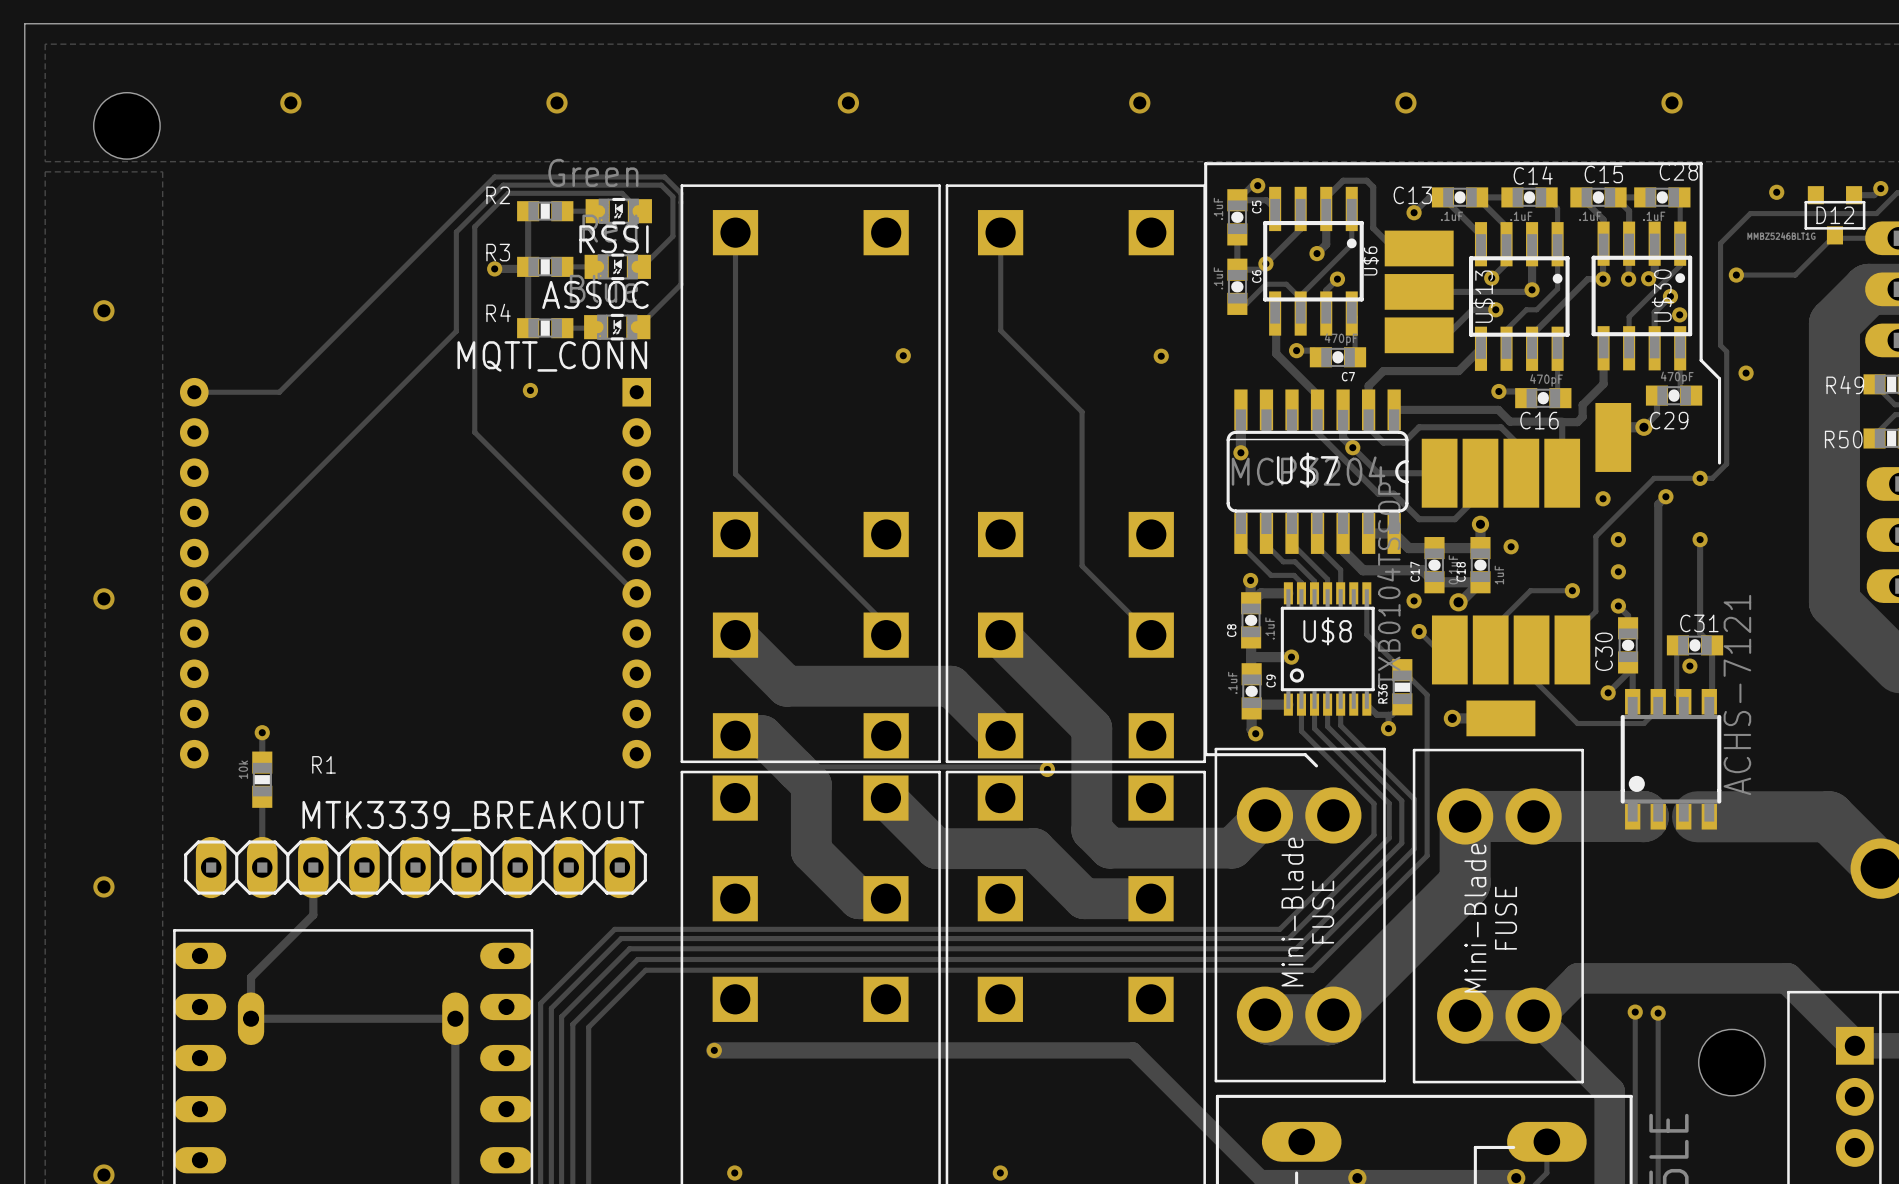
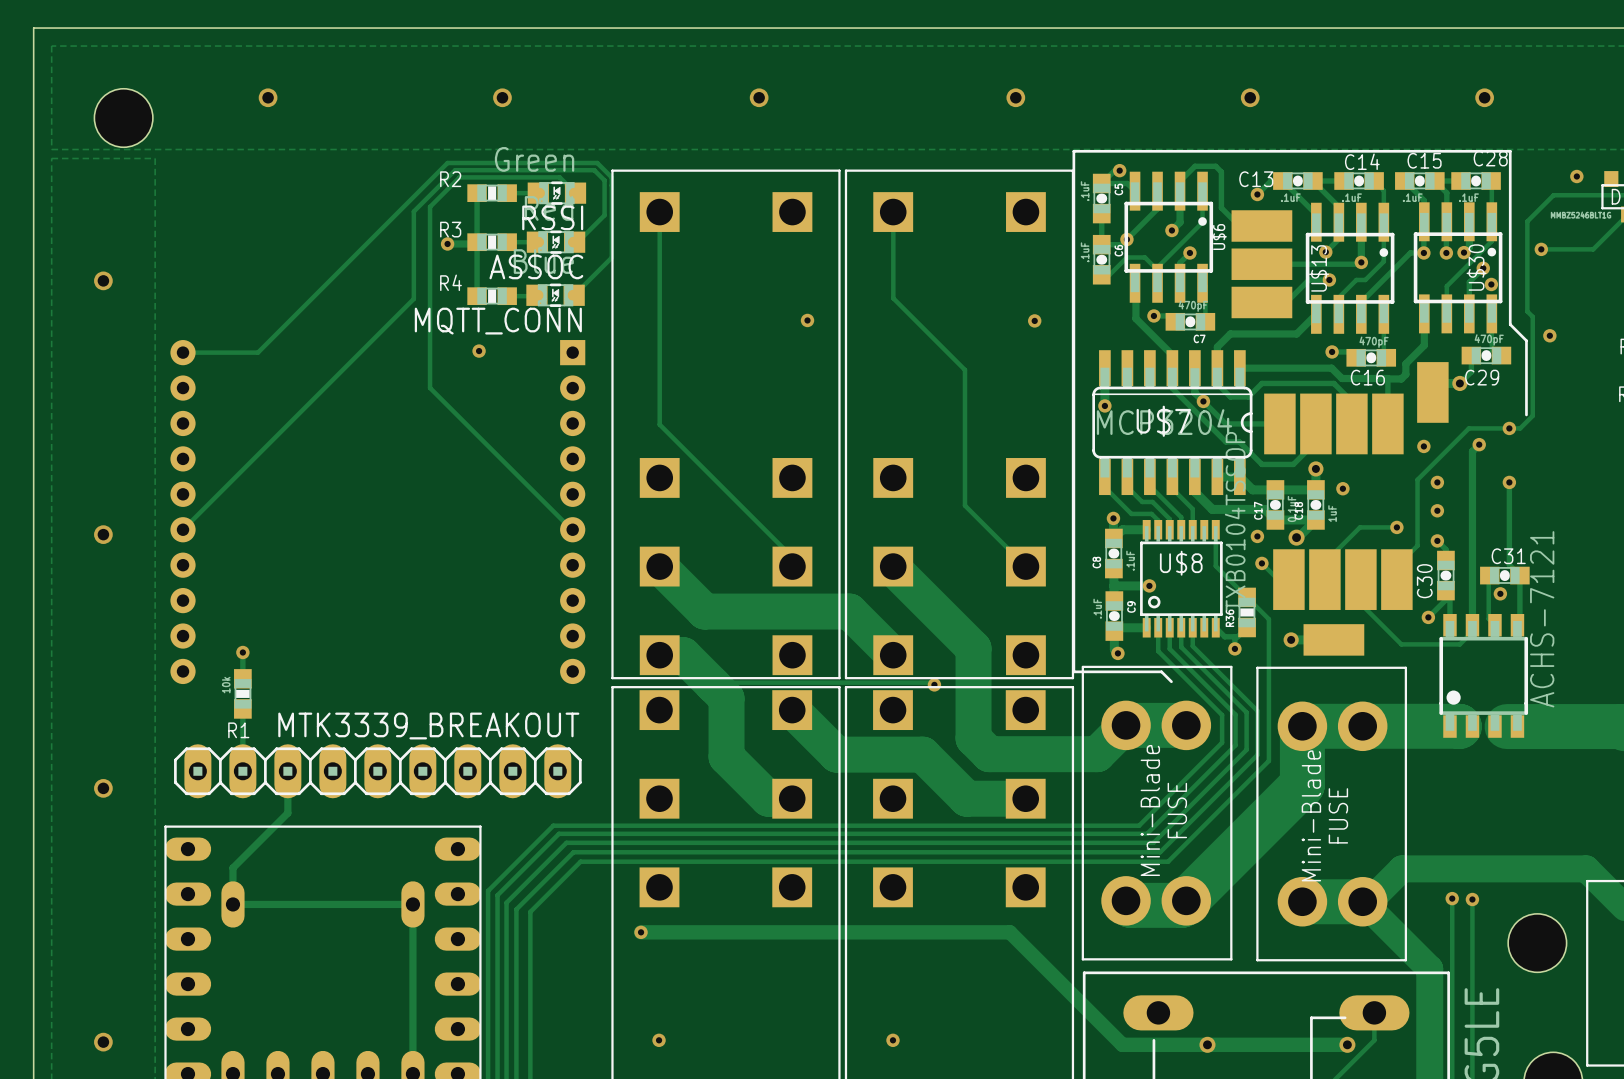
R1 name position: R1 (324, 764) -> R1 (238, 730)

